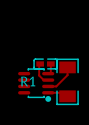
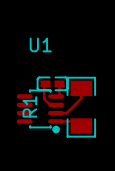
U1 name: none -> U1 (40, 44)
R1 name rotation: 0° (28, 81) -> 90° counterclockwise (29, 106)

